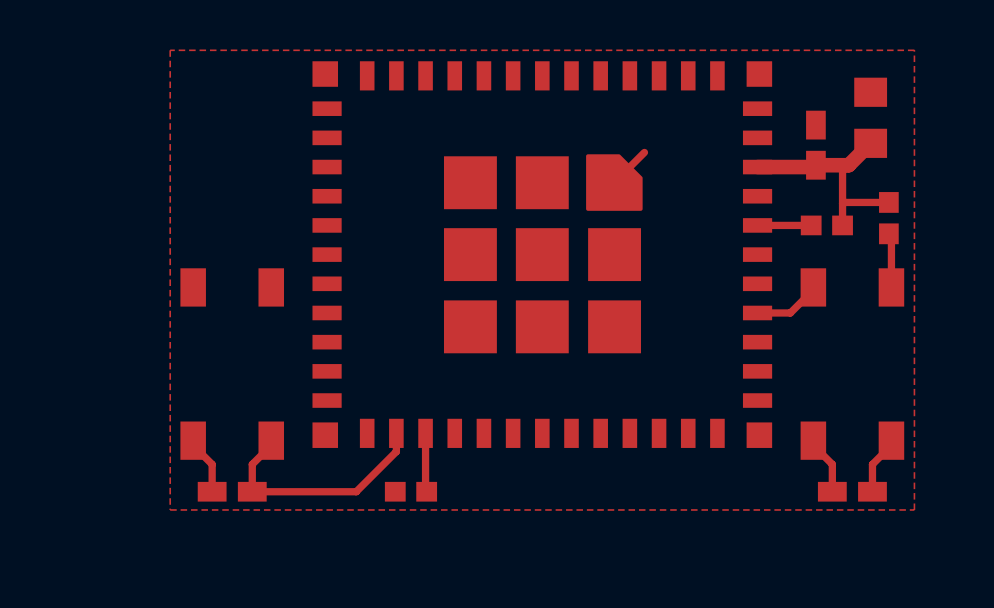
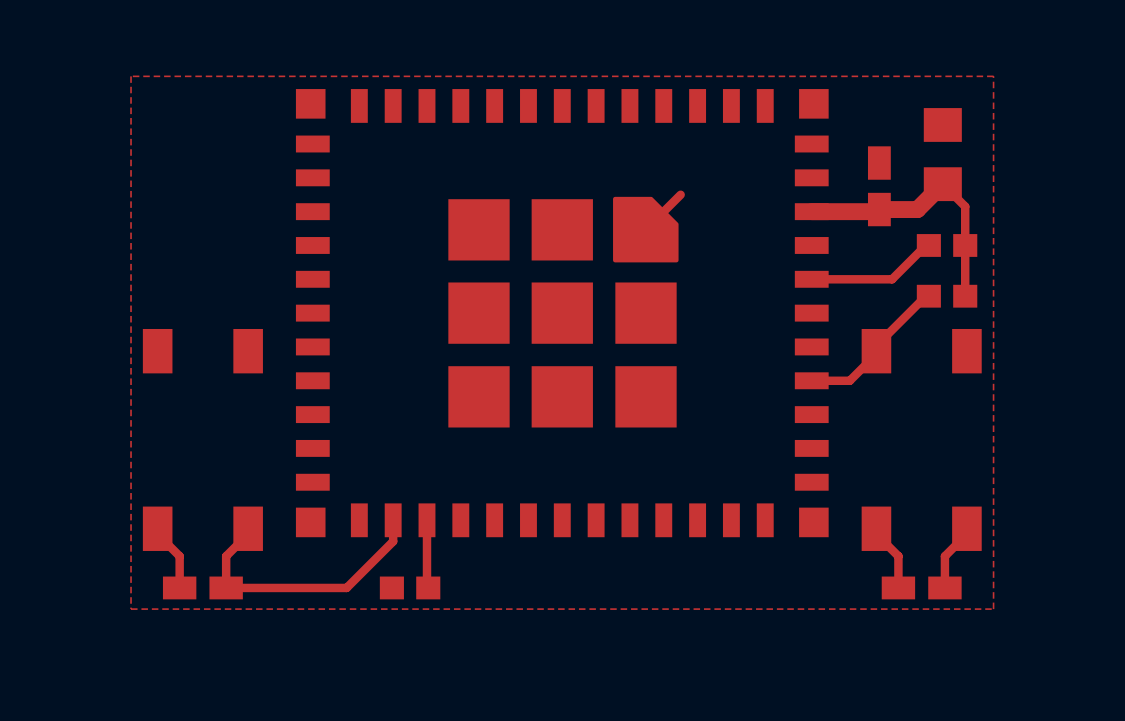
top track: none -> (942, 184) (965, 206) (965, 296)
top track: (848, 165) (842, 171) (842, 225) -> none
top track: none -> (928, 245) (925, 245) (892, 279) (873, 279)
part: none -> (947, 245)
top track: (888, 202) (842, 203) -> none
part: (888, 218) -> none
part: (826, 225) -> none
top track: (888, 233) (891, 236) (891, 287) -> none
top track: none -> (928, 296) (925, 296) (876, 345) (876, 351)
part: none -> (947, 296)

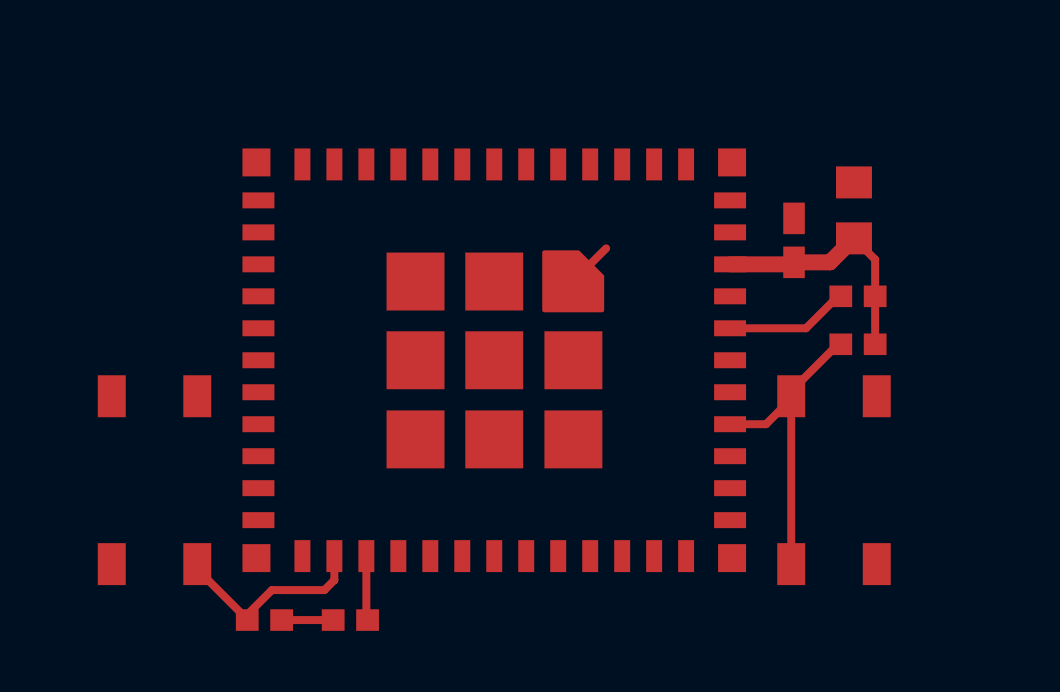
top zone outline: (993, 76) (131, 76) (131, 609) (993, 609) (993, 76) -> none
top track: (157, 528) (157, 534) (179, 556) (179, 587) -> none
top track: (876, 528) (876, 534) (898, 556) (898, 587) -> (791, 564) (791, 399)
top track: (966, 528) (966, 534) (944, 556) (944, 587) -> none
top track: (248, 534) (226, 556) (226, 587) (300, 587) -> (197, 569) (248, 620)
top track: (393, 541) (346, 587) -> (334, 576) (334, 580) (324, 590) (271, 590) (247, 614) (247, 620)
part: (202, 587) -> none
part: none -> (264, 620)
top track: (337, 587) (301, 587) -> none
top track: none -> (333, 620) (290, 620)
part: (921, 587) -> none

